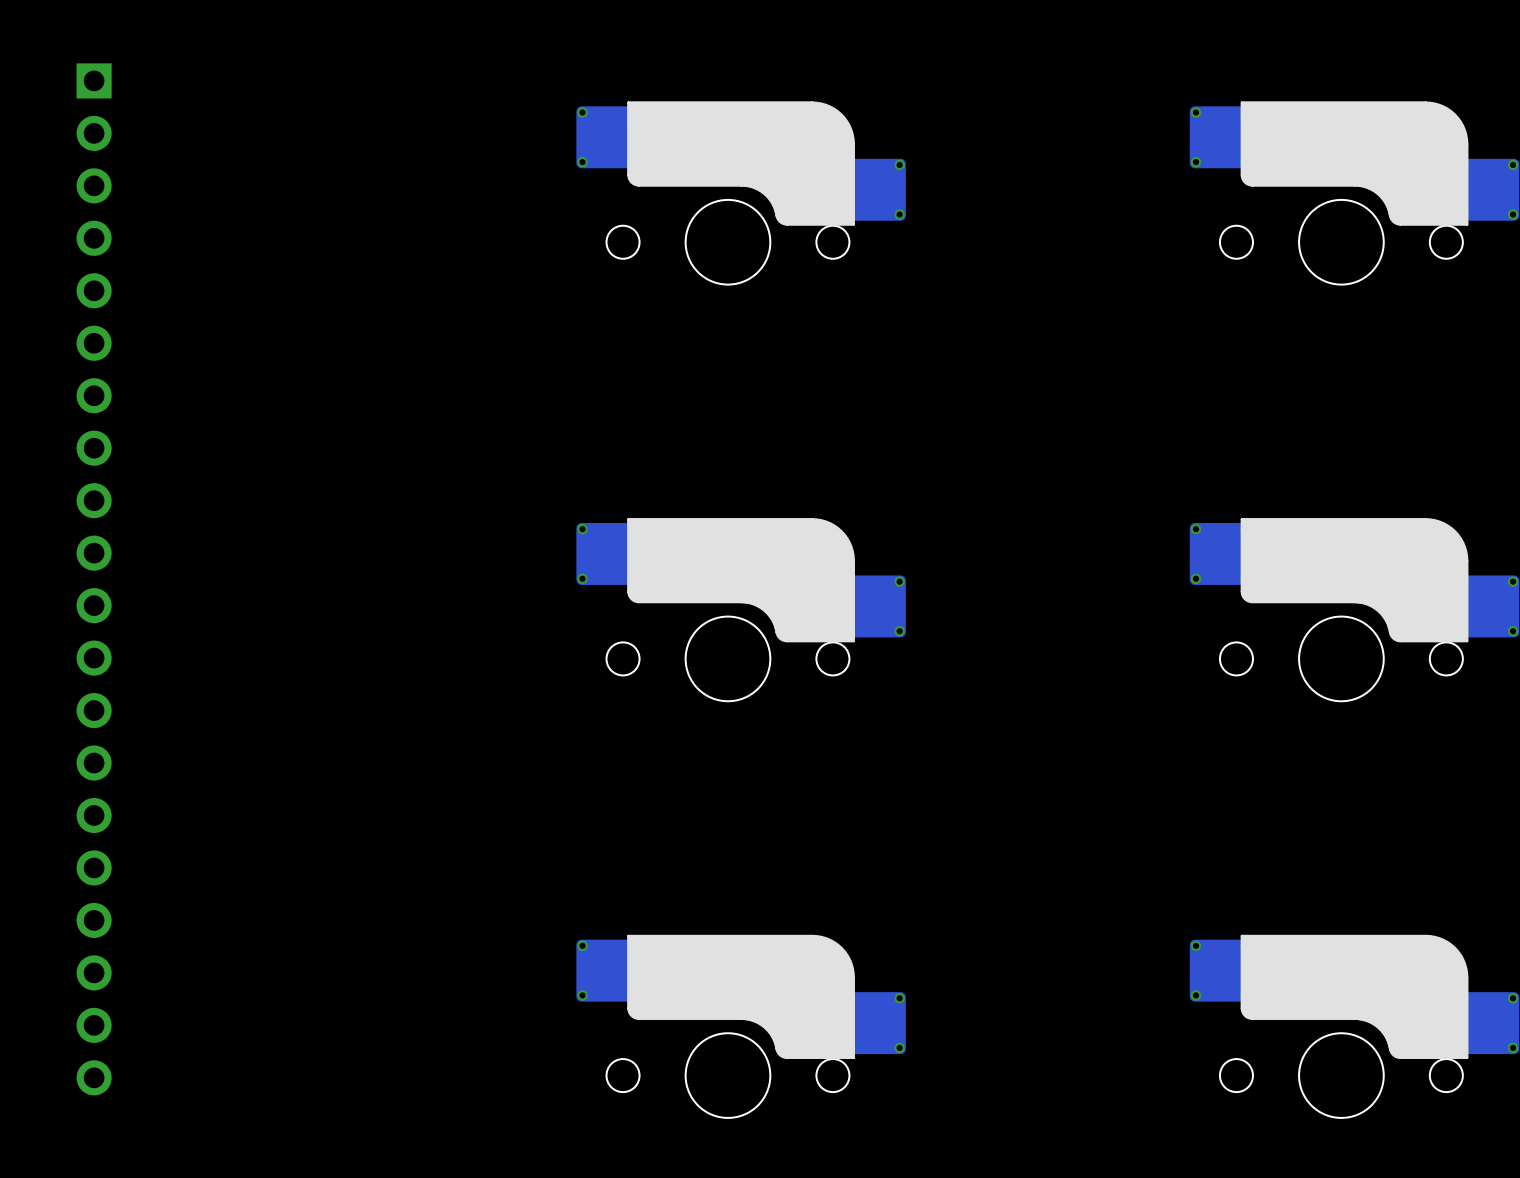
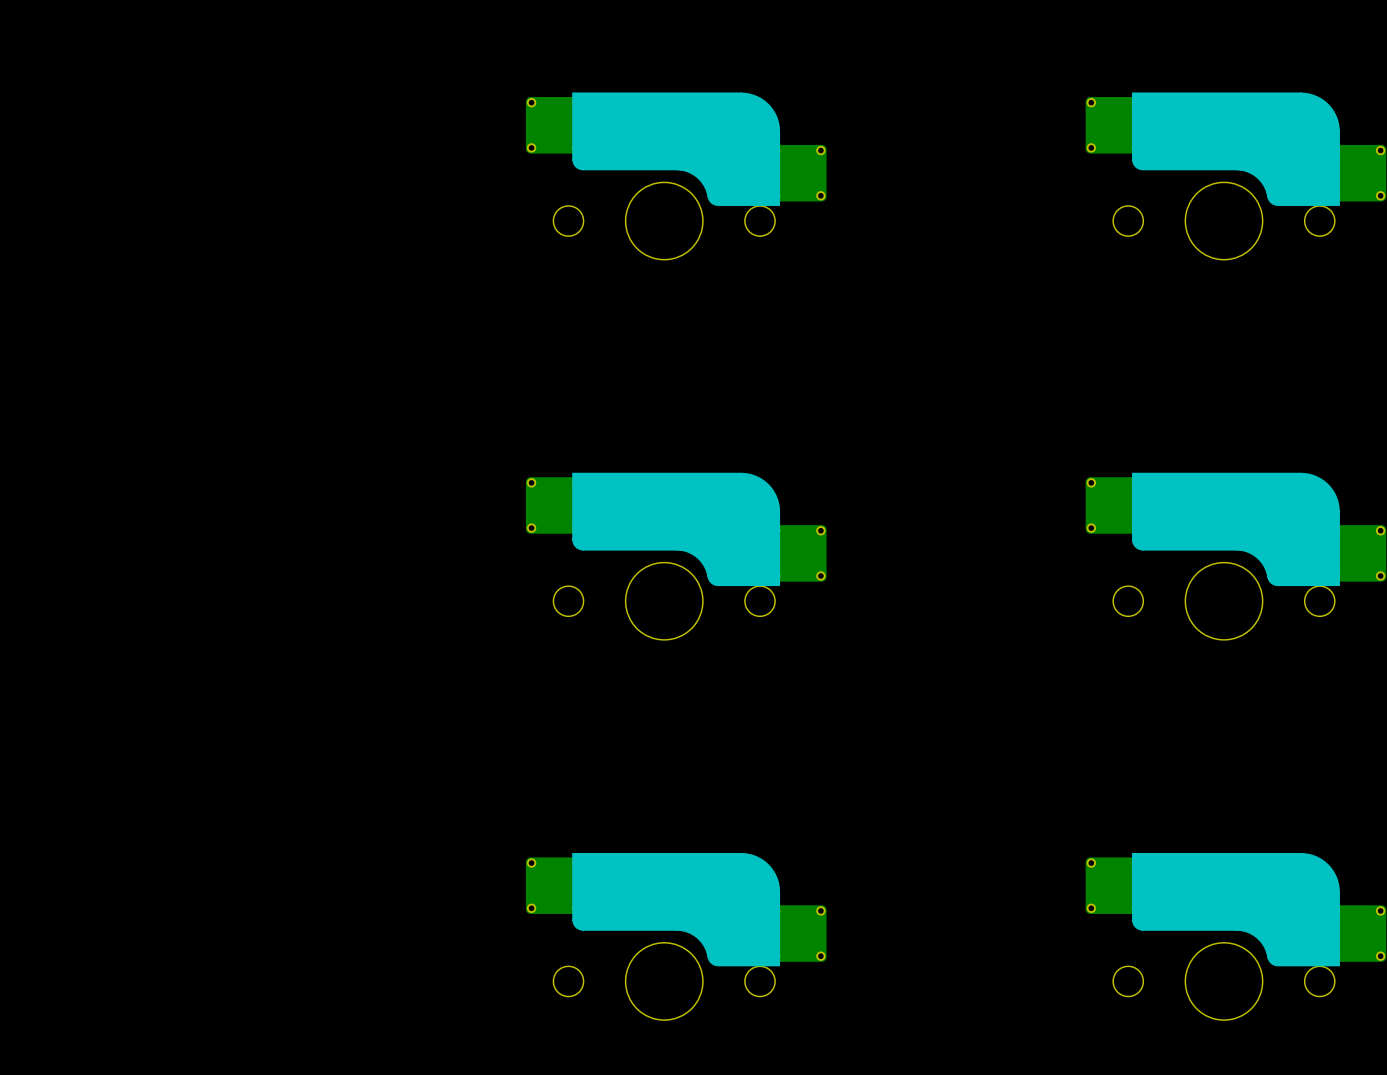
part: (94, 579) -> none

